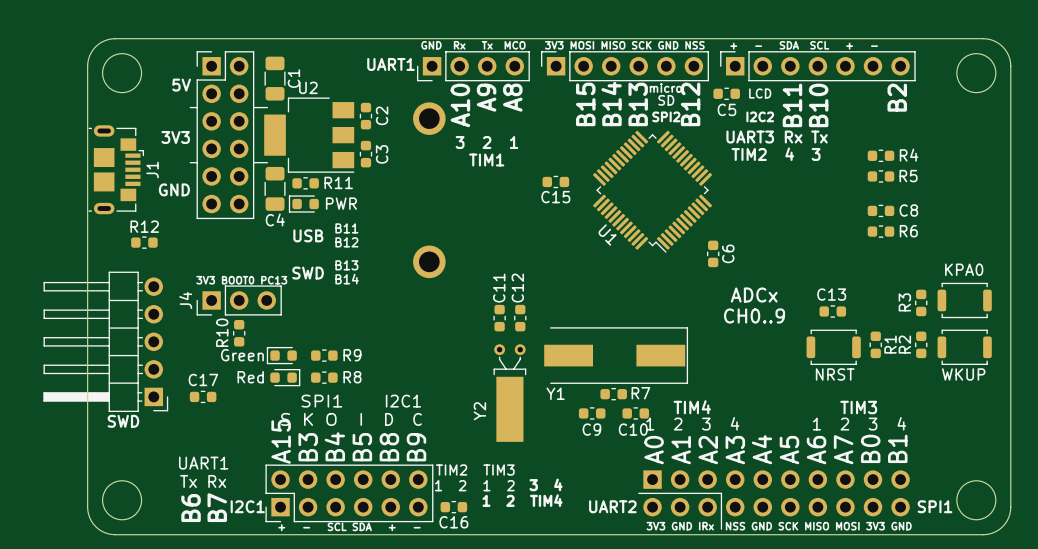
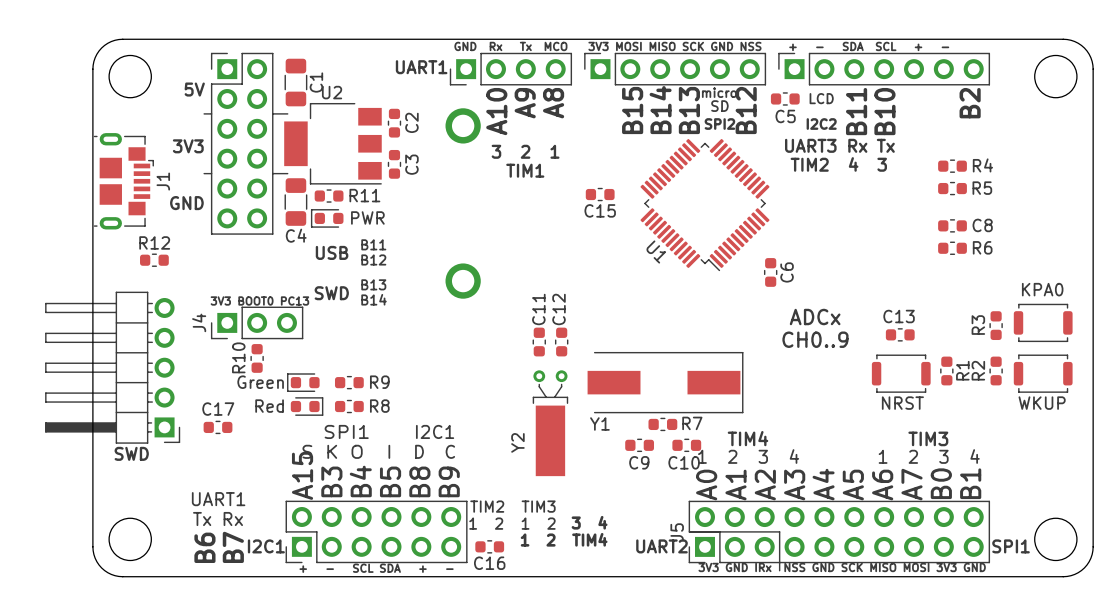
part: (776, 493) -> none
J5: none -> (839, 531)

